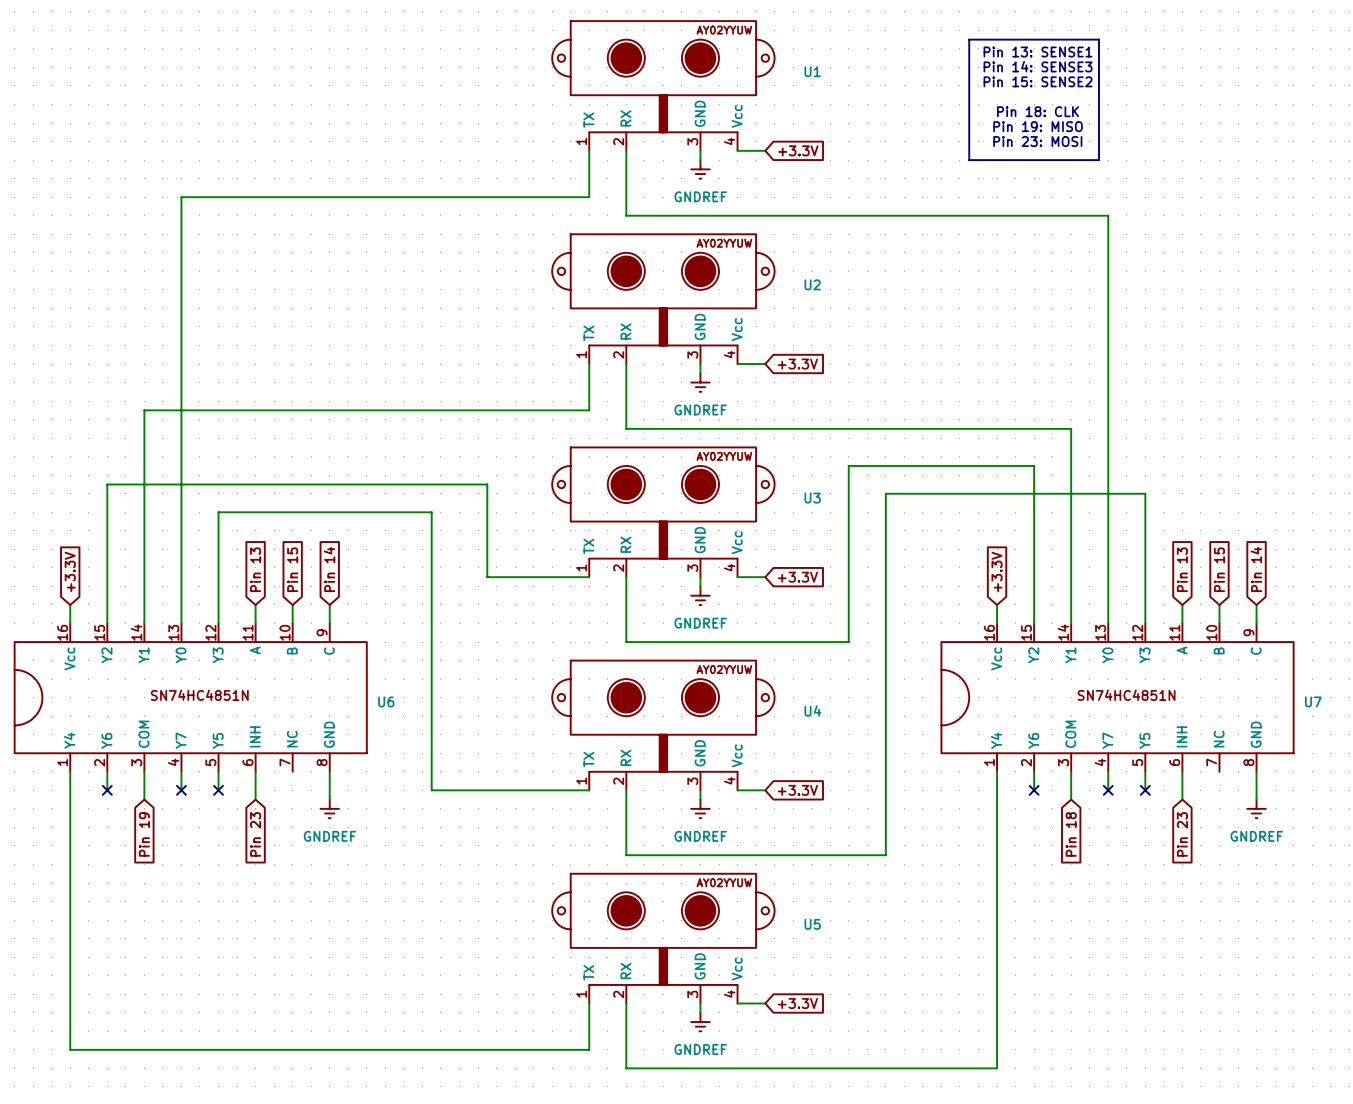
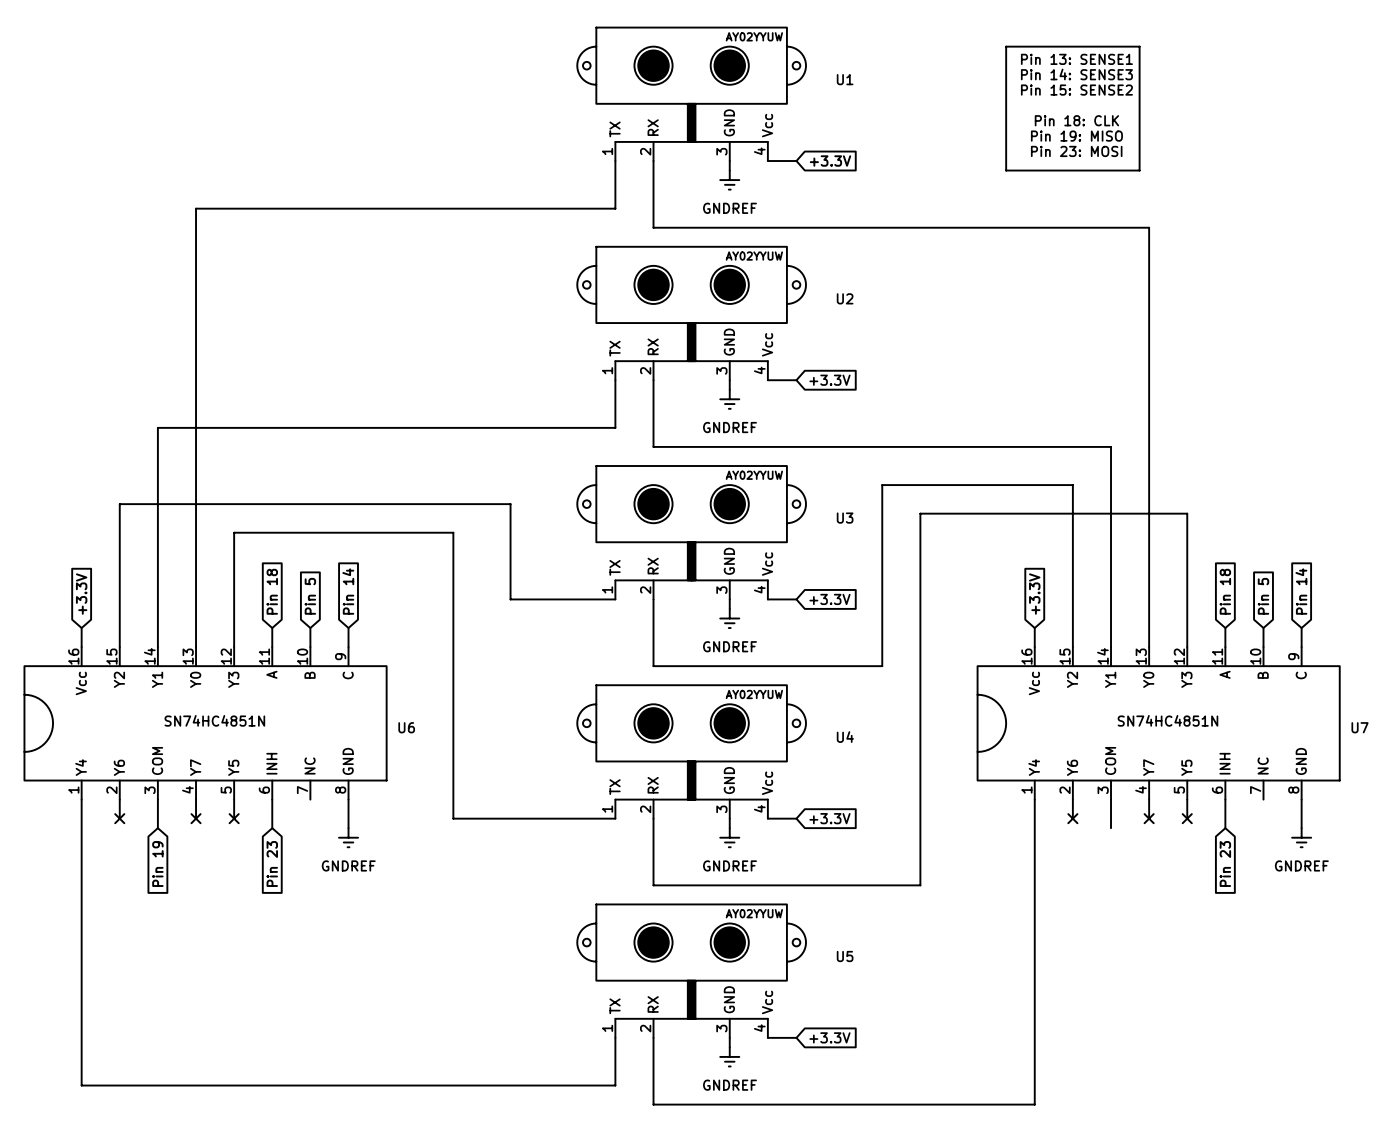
global label: Pin 13 (255, 569) -> Pin 18 (272, 591)
global label: Pin 15 (292, 569) -> Pin 5 (310, 596)
global label: Pin 13 (1182, 569) -> Pin 18 (1225, 591)
global label: Pin 15 (1219, 569) -> Pin 5 (1263, 596)
global label: Pin 18 (1071, 834) -> none

